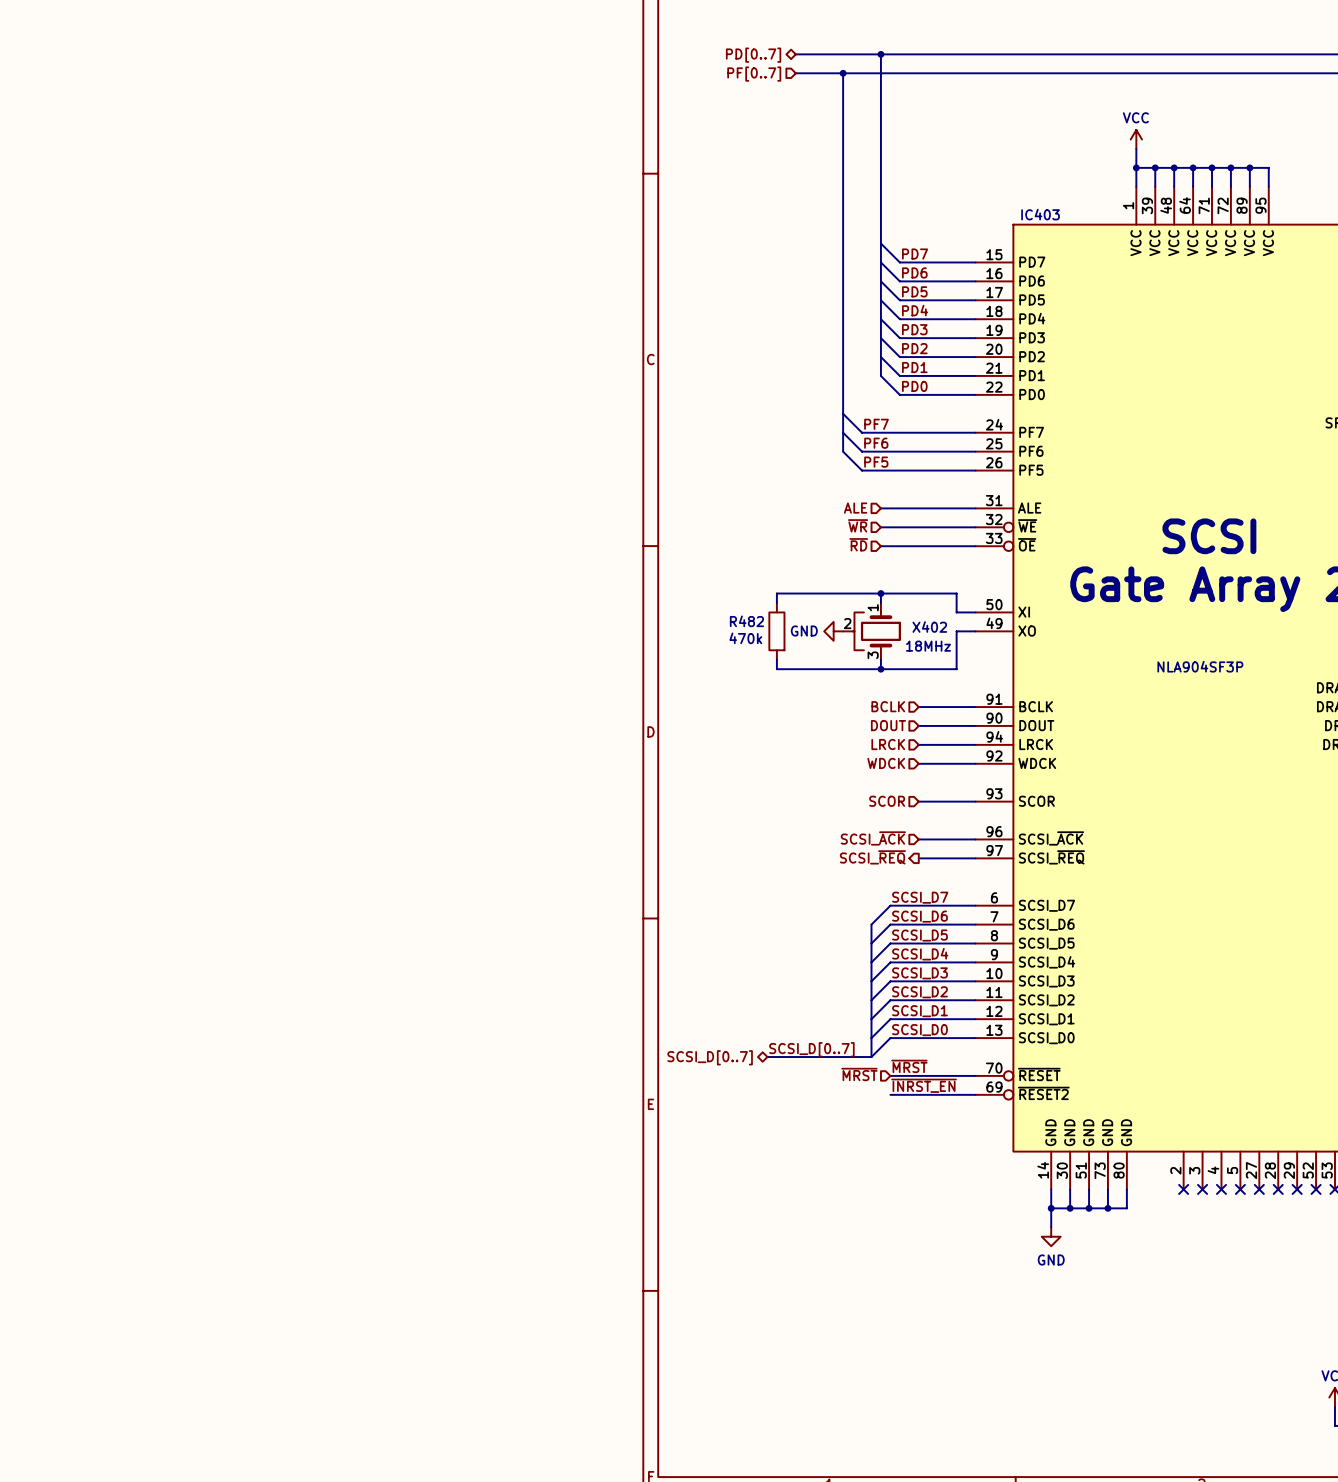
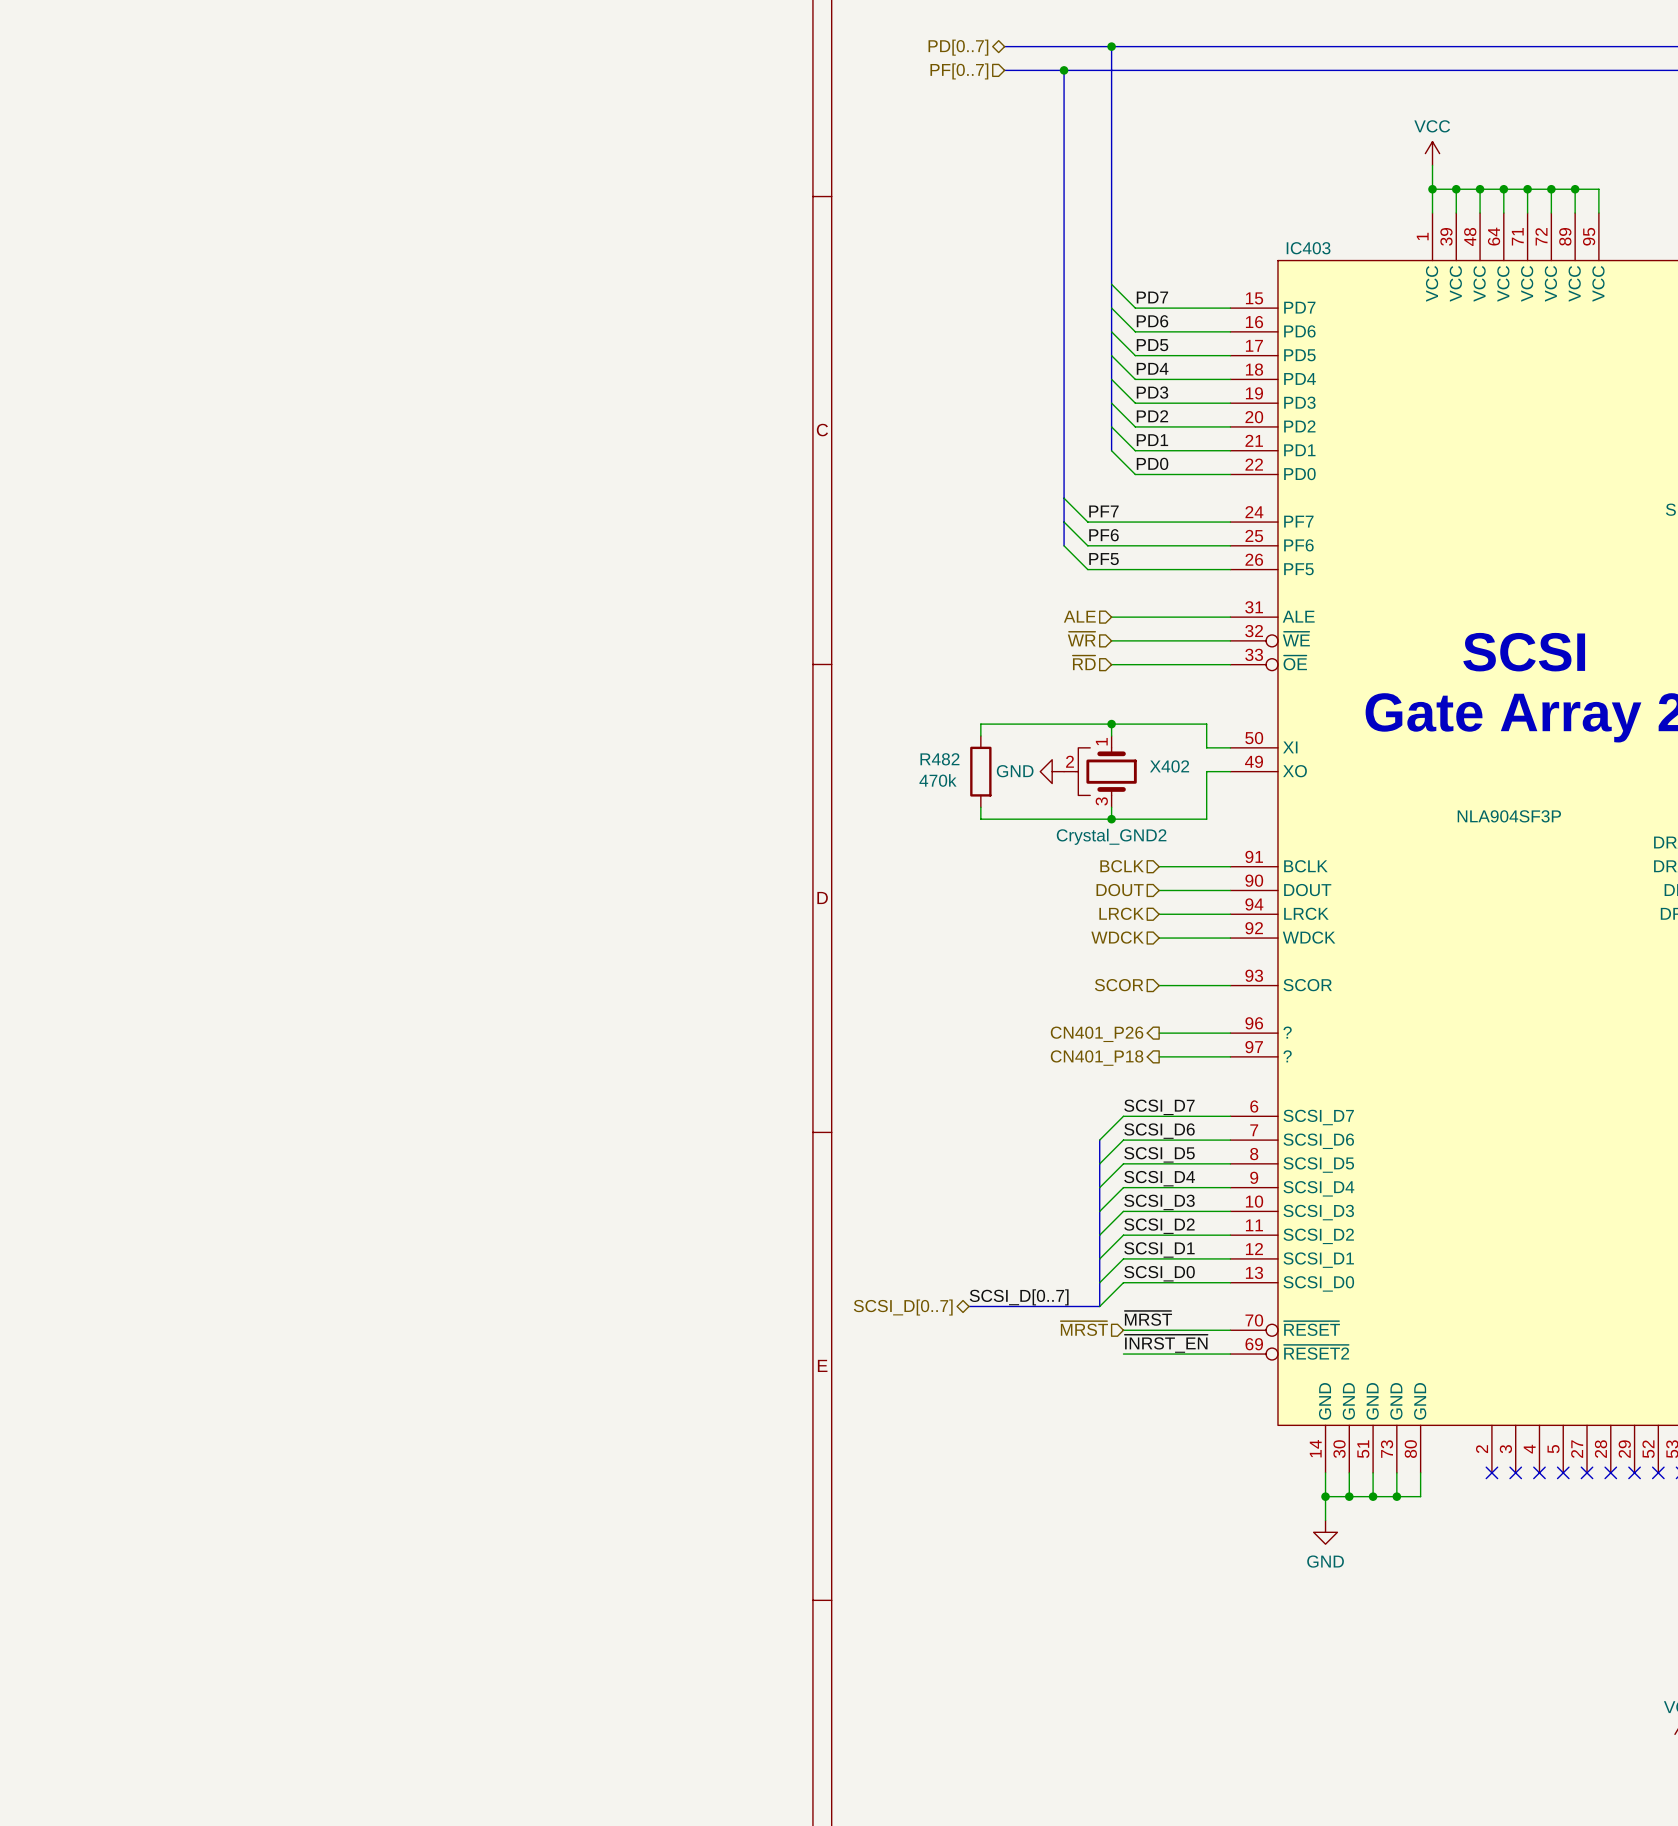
X402 value: 18MHz (928, 646) -> Crystal_GND2 (1111, 836)
hierarchical label shape: input (873, 838) -> output (1097, 1034)
hierarchical label: SCSI_~{ACK} (873, 838) -> CN401_P26 (1097, 1034)
IC403 pin name: SCSI_~{ACK} (1051, 838) -> ? (1287, 1032)
hierarchical label: SCSI_~{REQ} (872, 857) -> CN401_P18 (1097, 1058)
IC403 pin name: SCSI_~{REQ} (1051, 857) -> ? (1287, 1056)

